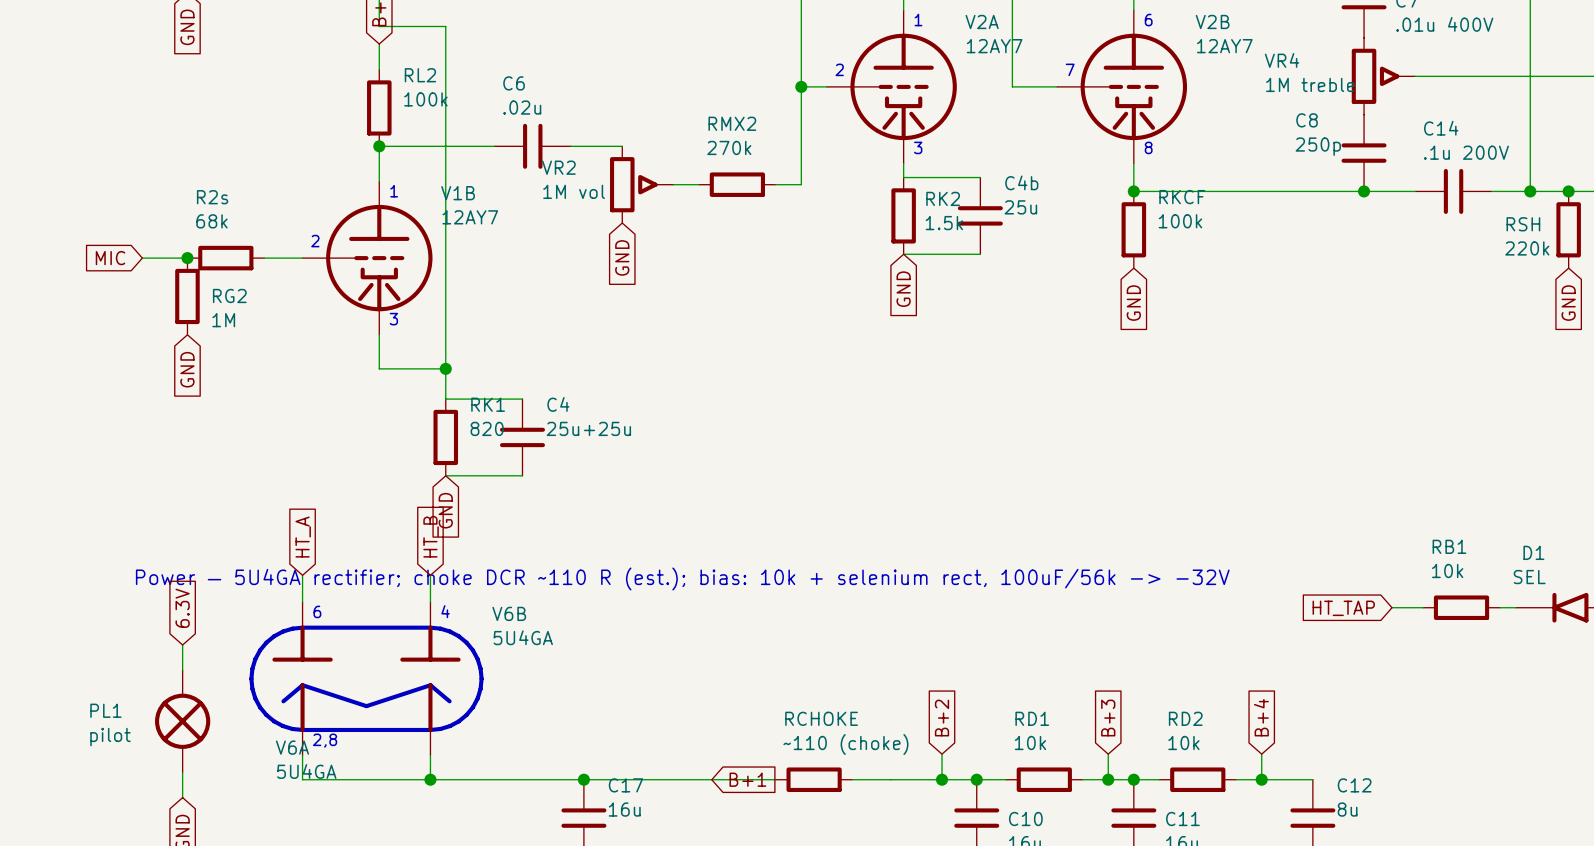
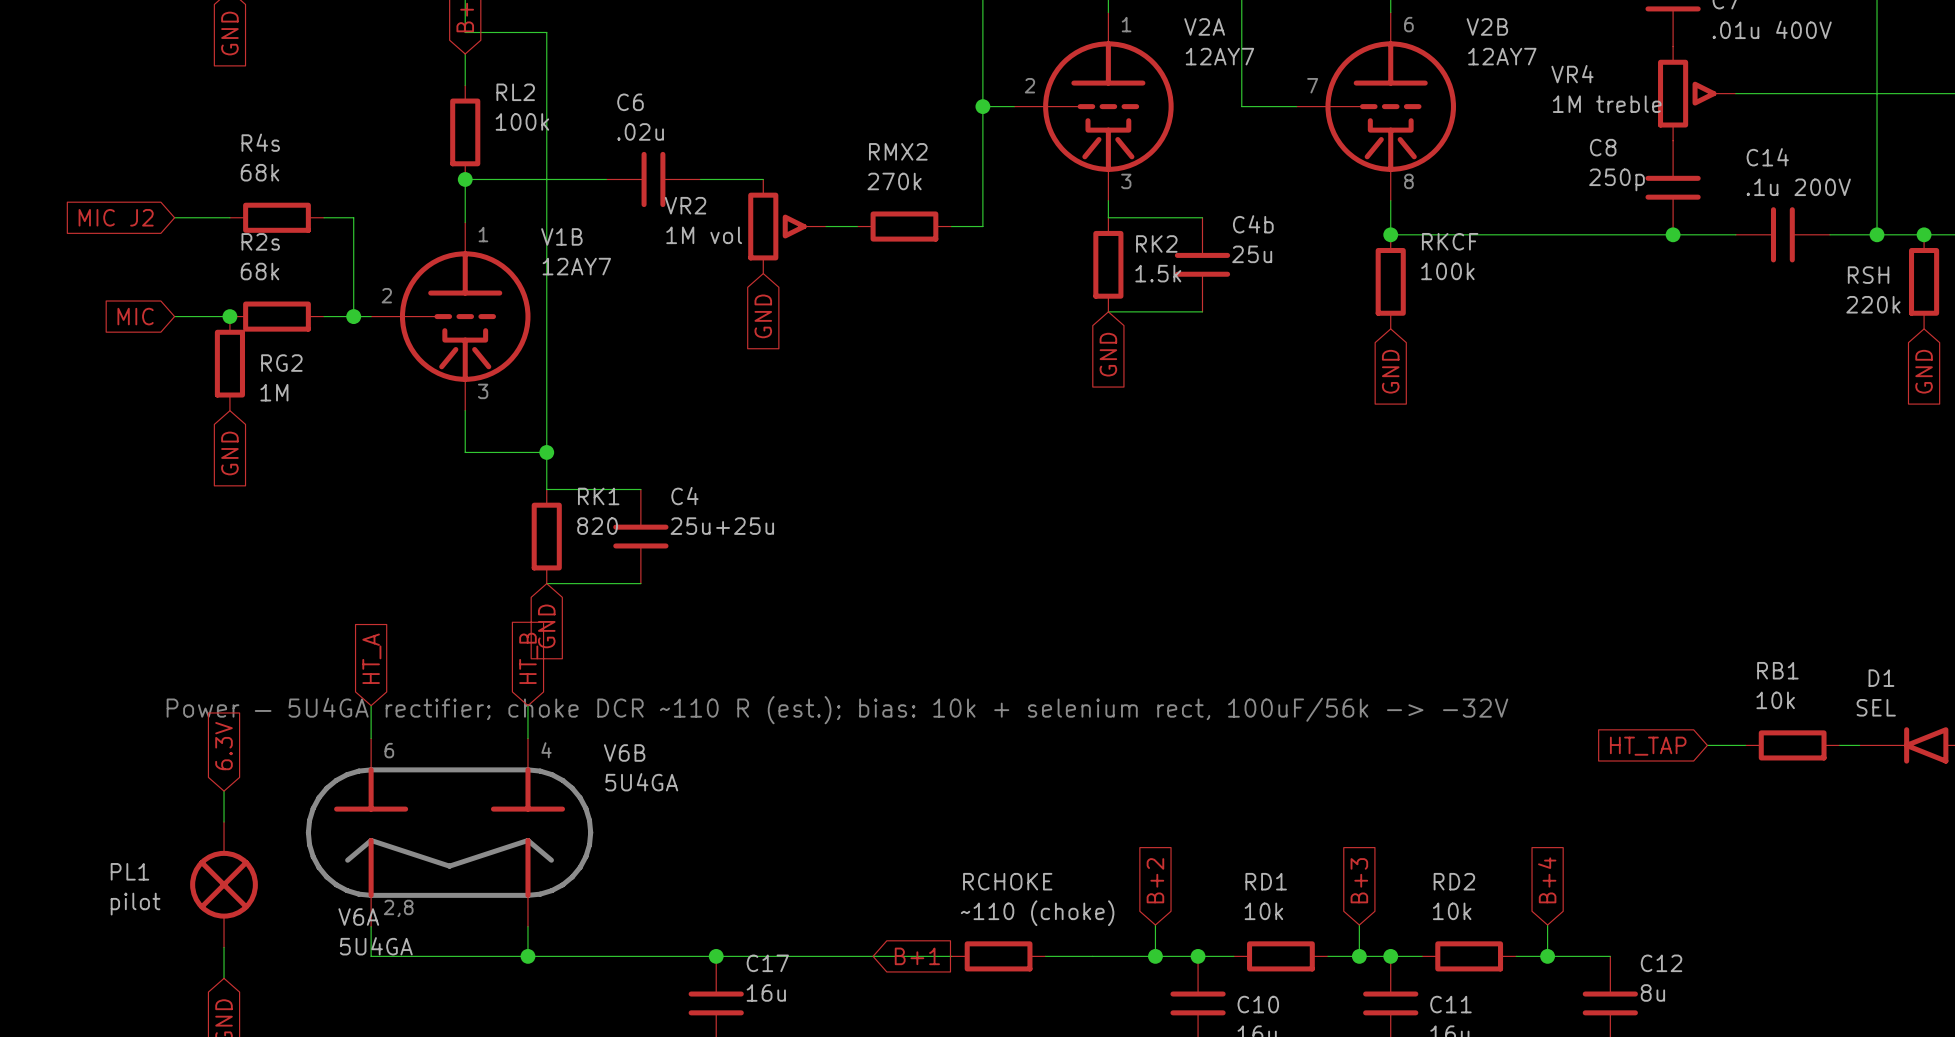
global label: none -> MIC J2 (116, 217)
wire: none -> (174, 217) (229, 217)
R4s: none -> 68k (277, 217)
wire: none -> (324, 217) (353, 217) (353, 316)
junction: none -> (353, 316)

